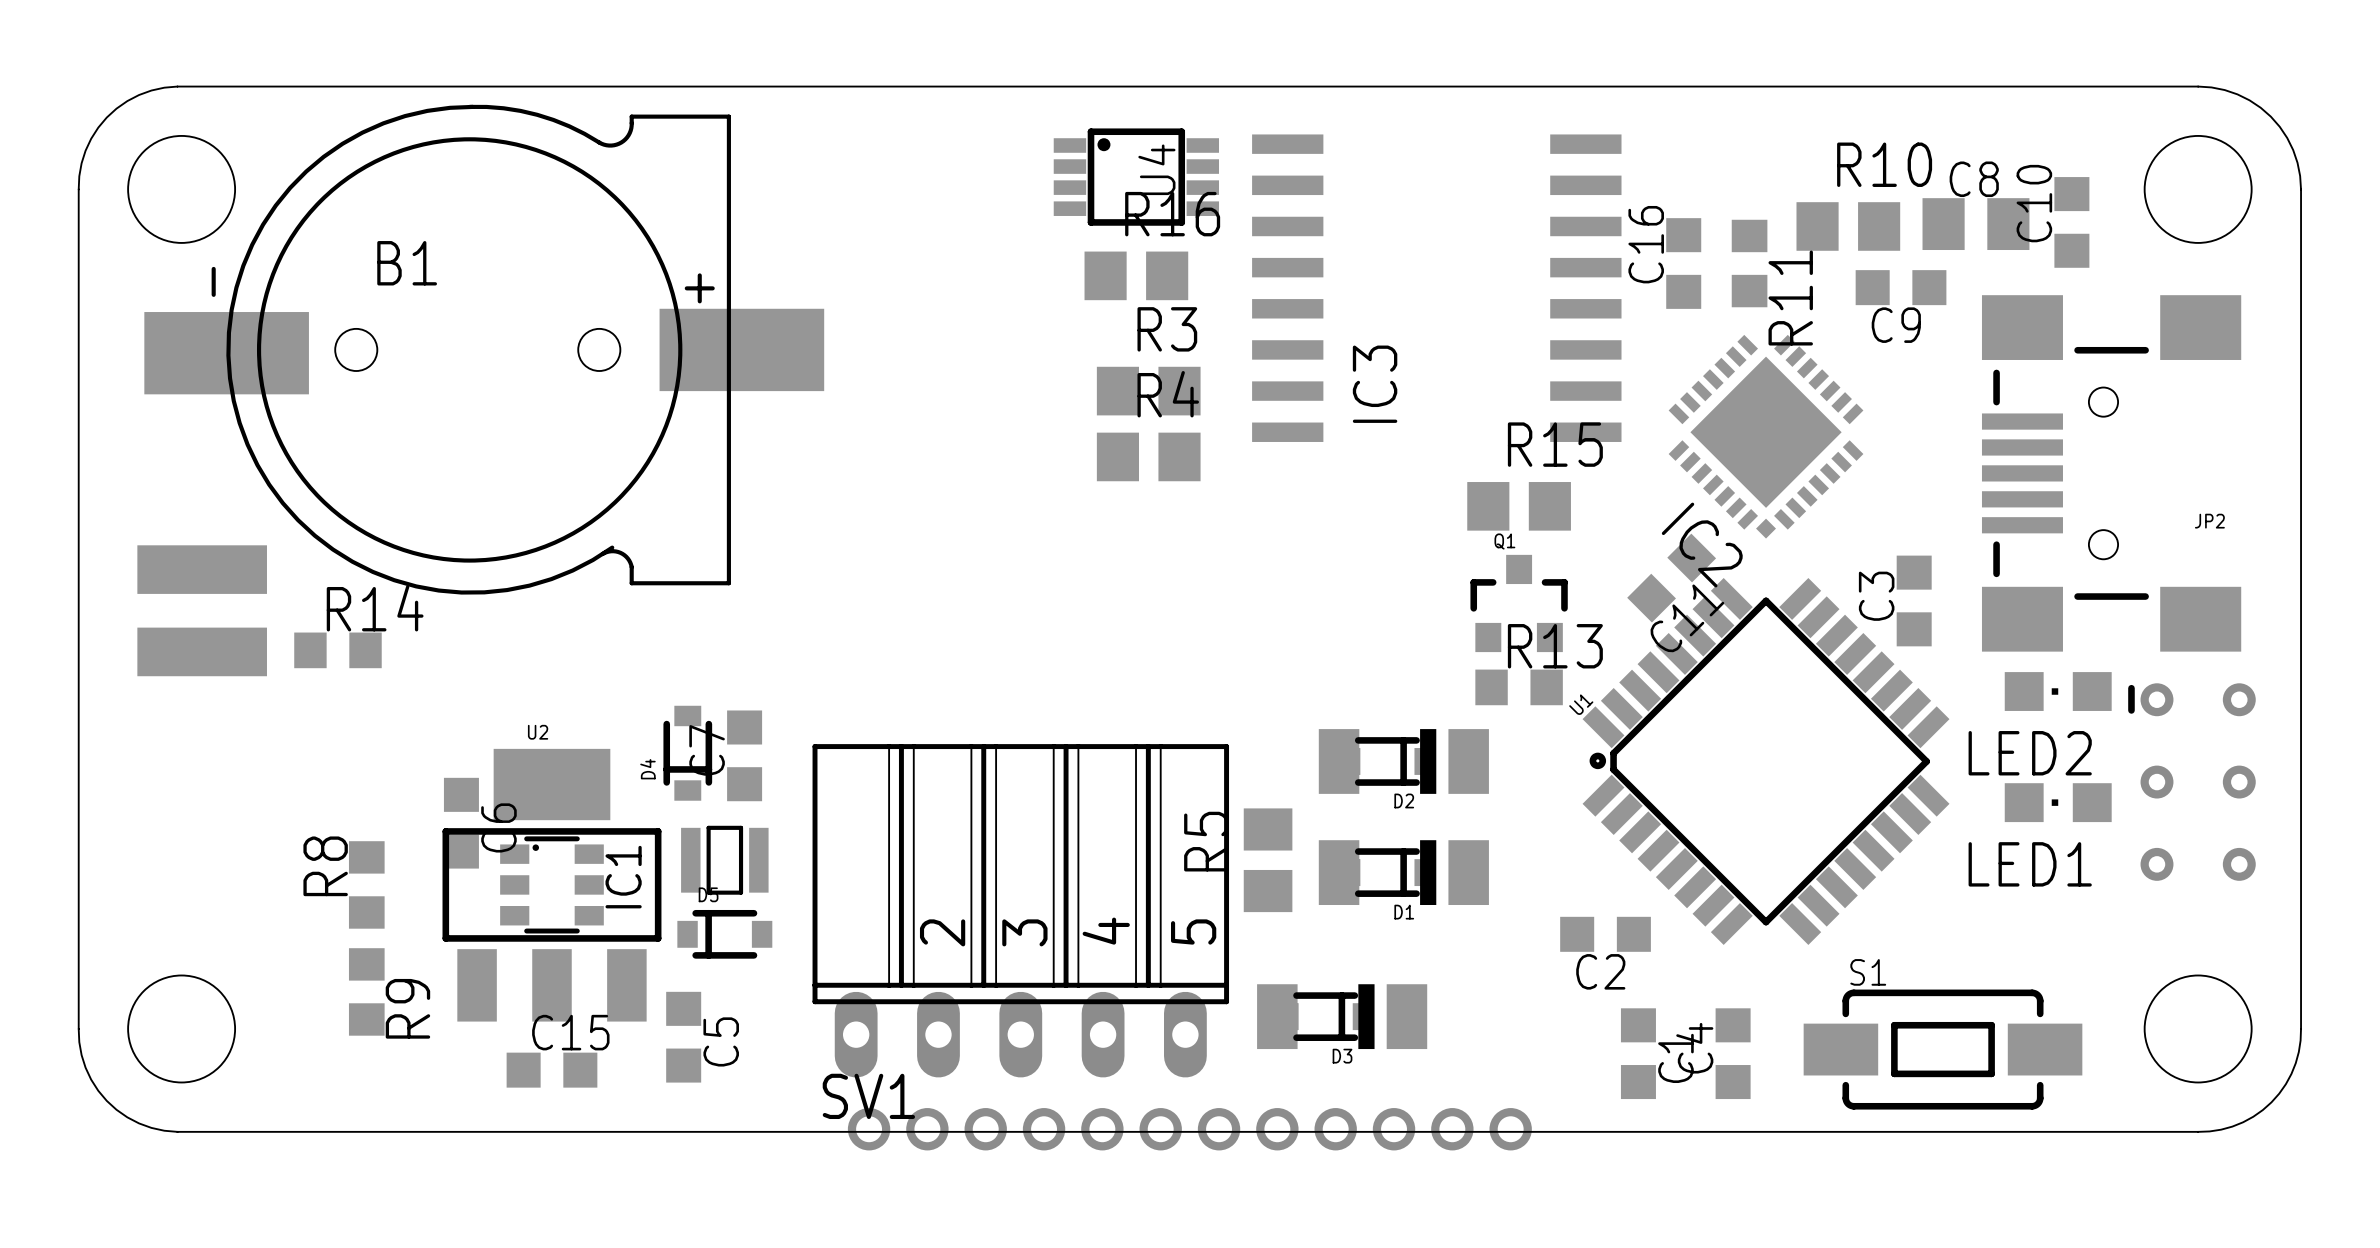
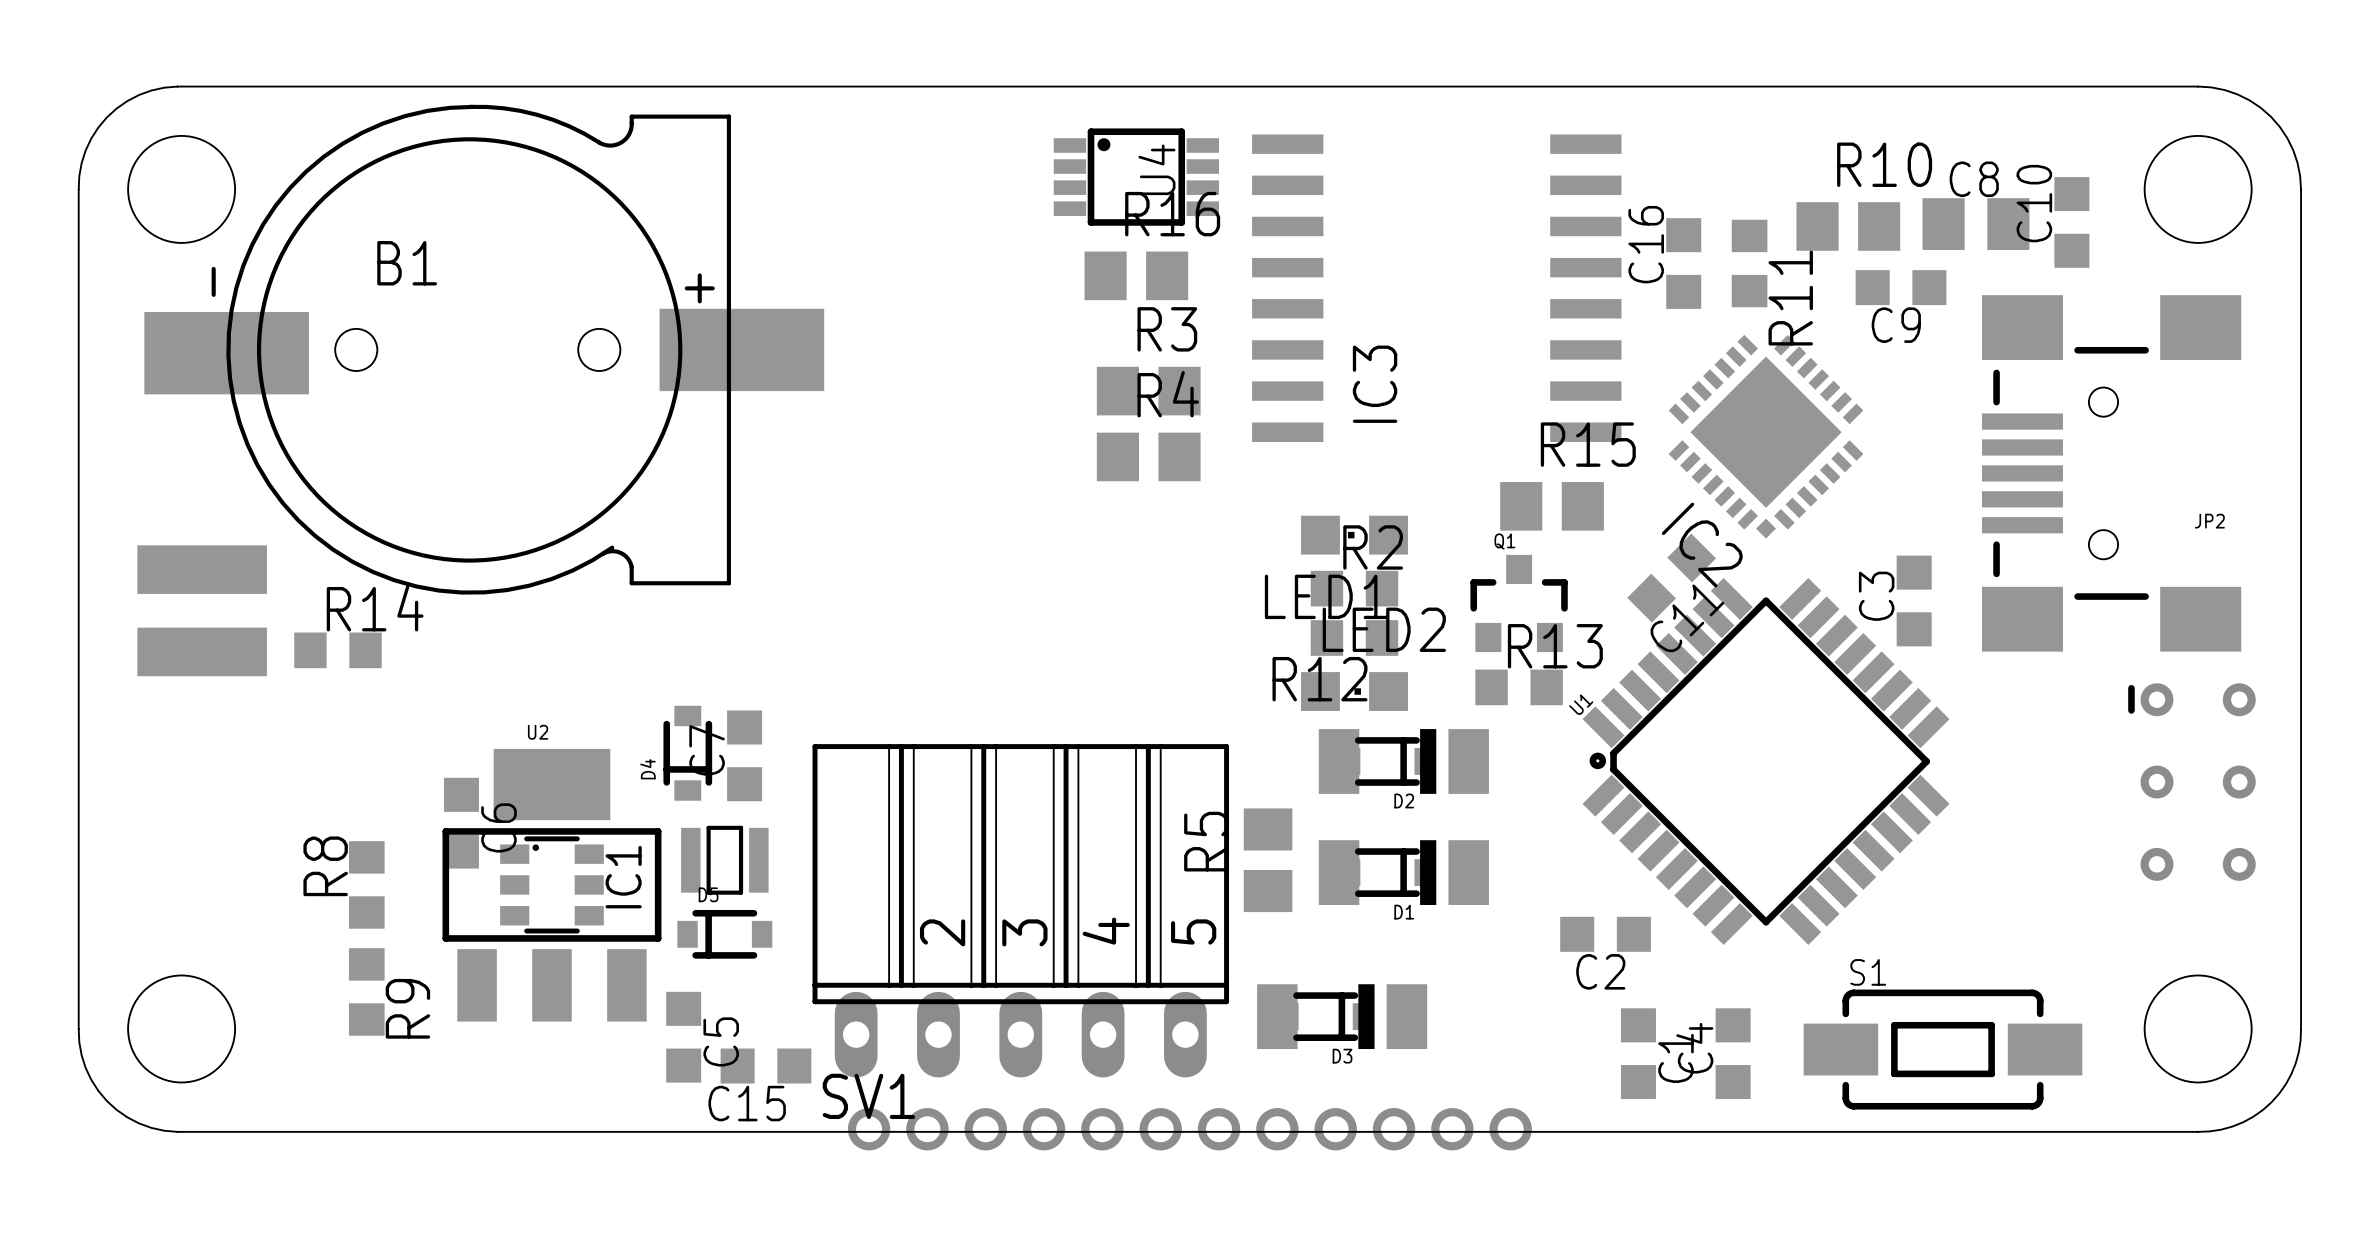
R15 position: (1519, 506) -> (1552, 506)
R2: none -> (1354, 588)
R12: none -> (1354, 638)
LED2 rotation: 0° (2058, 691) -> 180° (1354, 691)
LED2 position: (2058, 691) -> (1354, 691)
LED1 position: (2058, 802) -> (1354, 535)
C15 name position: C15 (570, 1032) -> C15 (747, 1103)
C15 position: (551, 1070) -> (765, 1066)

